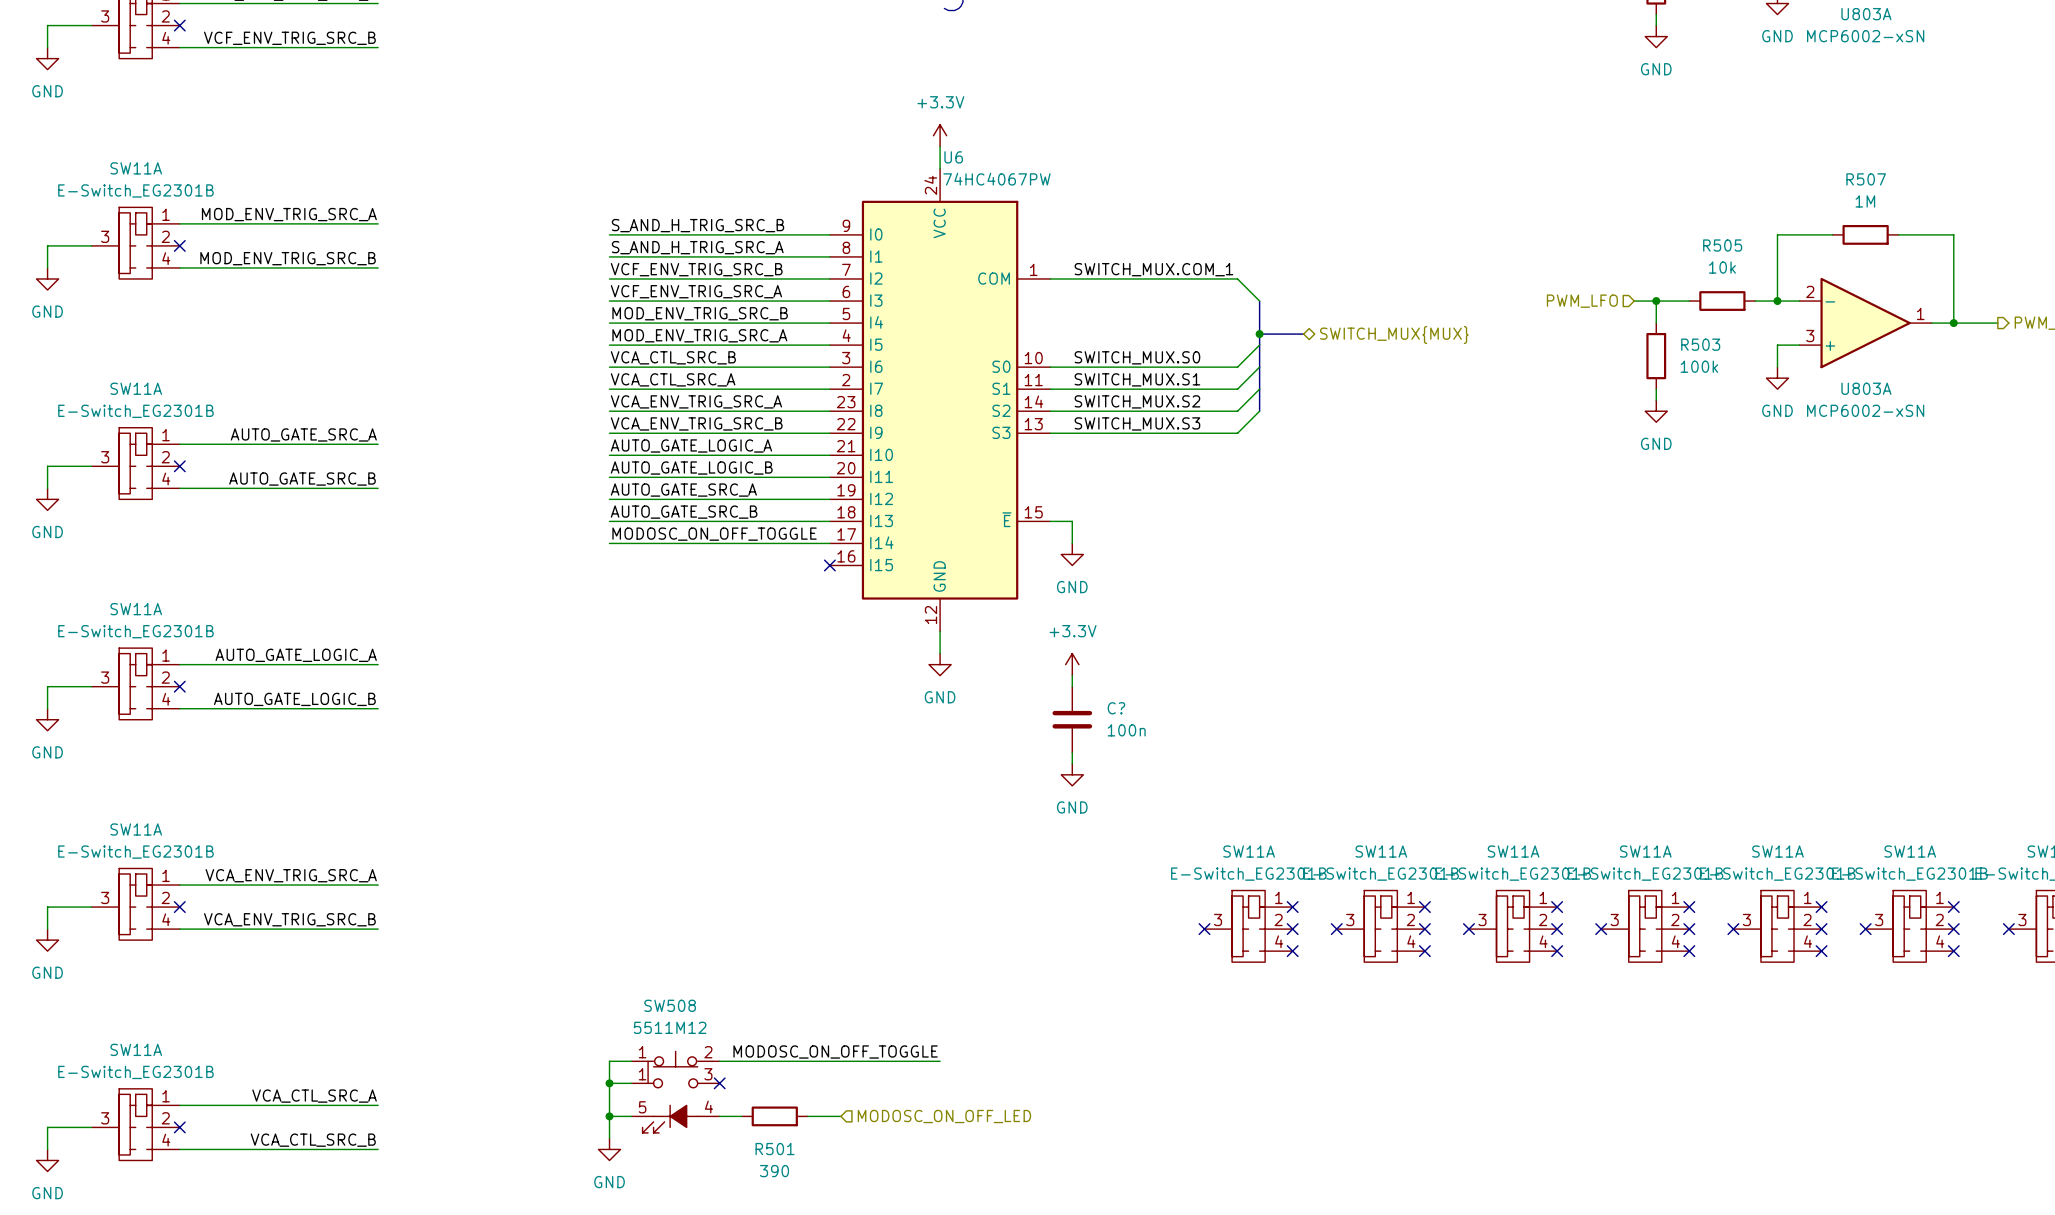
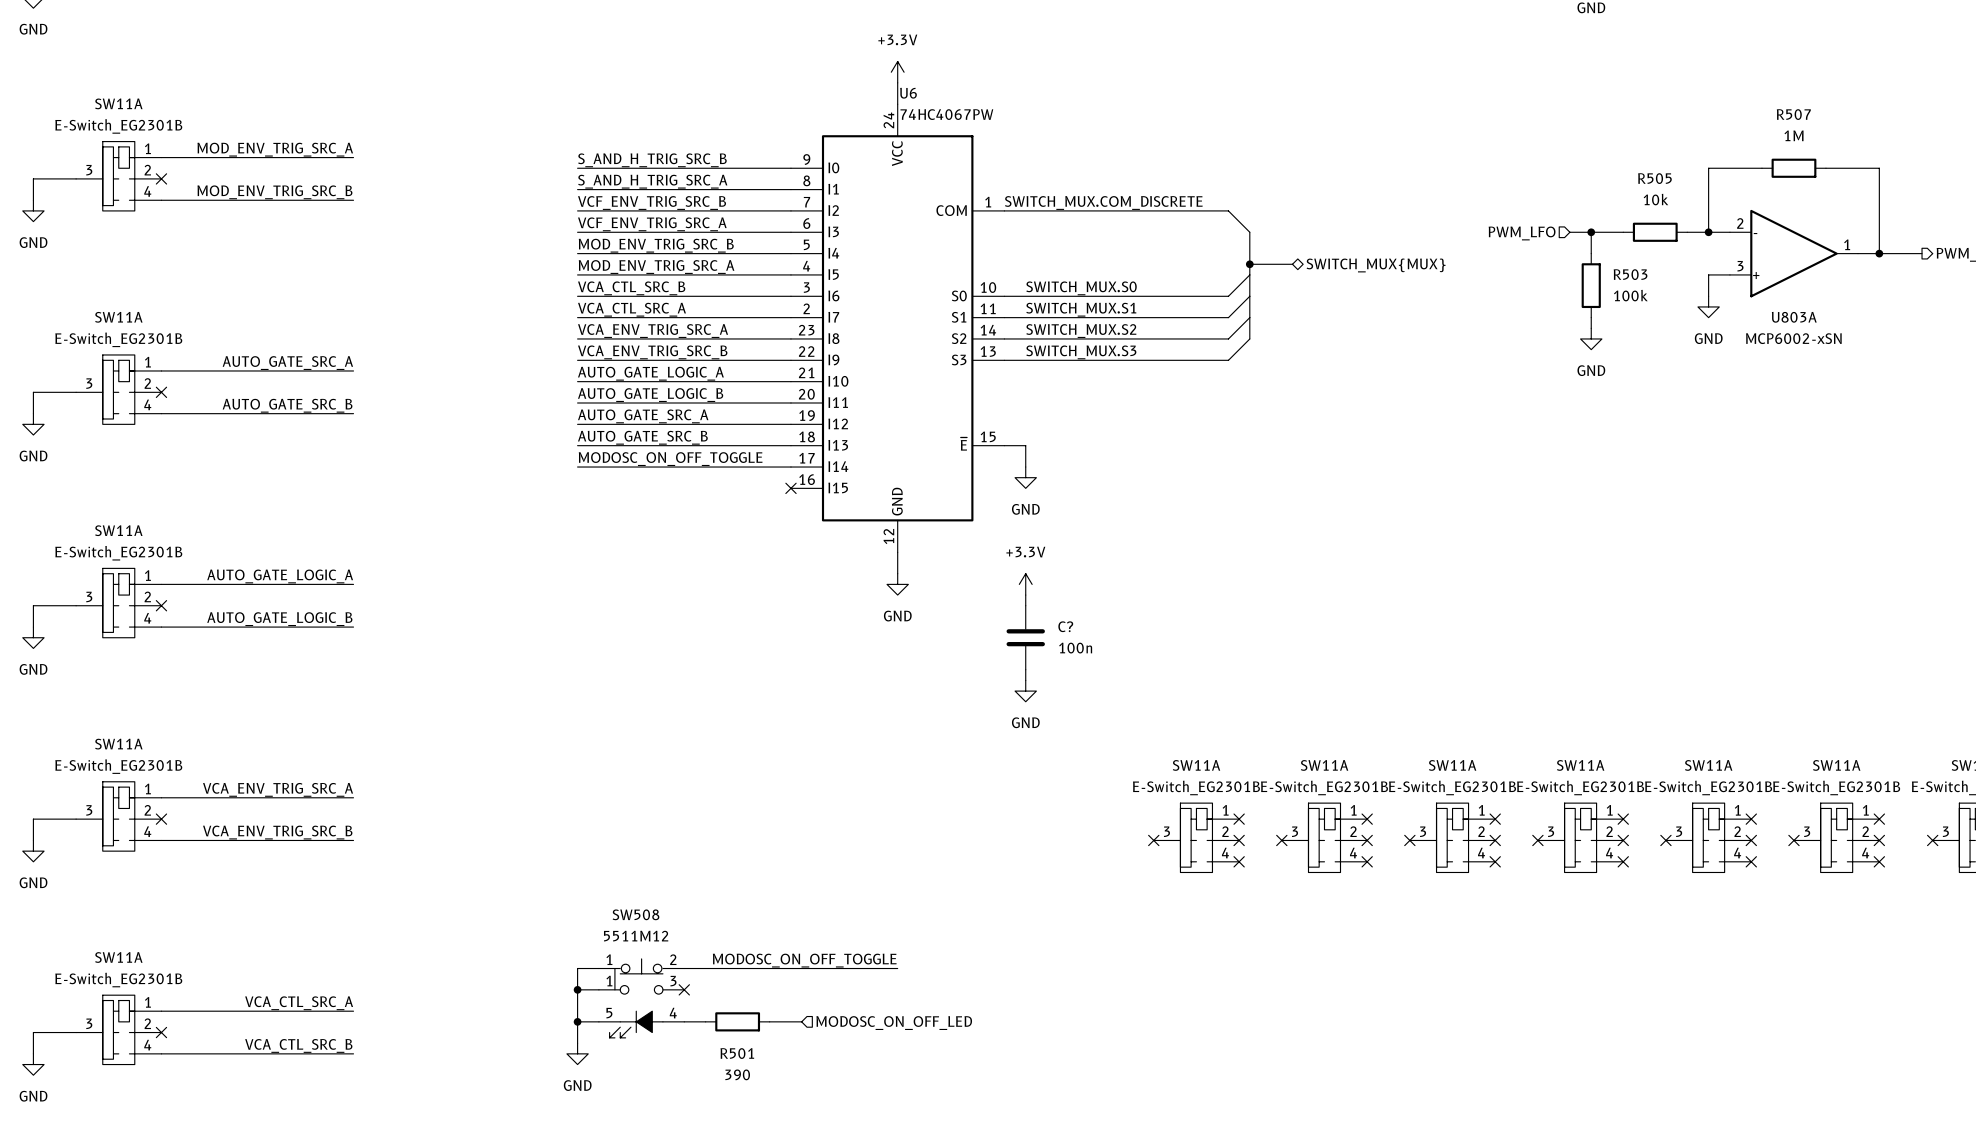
label: SWITCH_MUX.COM_1 (1153, 269) -> SWITCH_MUX.COM_DISCRETE (1103, 203)
wire: (1237, 278) (1259, 301) -> (1185, 210) (1228, 210) (1249, 232)
bus: (1259, 301) (1259, 411) -> (1249, 232) (1249, 338)
bus: (1259, 334) (1303, 334) -> (1292, 264) (1249, 264)
junction position: (1259, 334) -> (1249, 264)
hierarchical label position: SWITCH_MUX{MUX} (1394, 334) -> SWITCH_MUX{MUX} (1376, 265)
wire: (1259, 345) (1237, 367) -> (1249, 274) (1228, 296) (1185, 296)
wire: (1259, 367) (1237, 389) -> (1249, 296) (1228, 317) (1185, 317)
wire: (1259, 389) (1237, 411) -> (1249, 317) (1228, 338) (1185, 338)
wire: (1259, 411) (1237, 433) -> (1249, 338) (1228, 360) (1185, 360)

